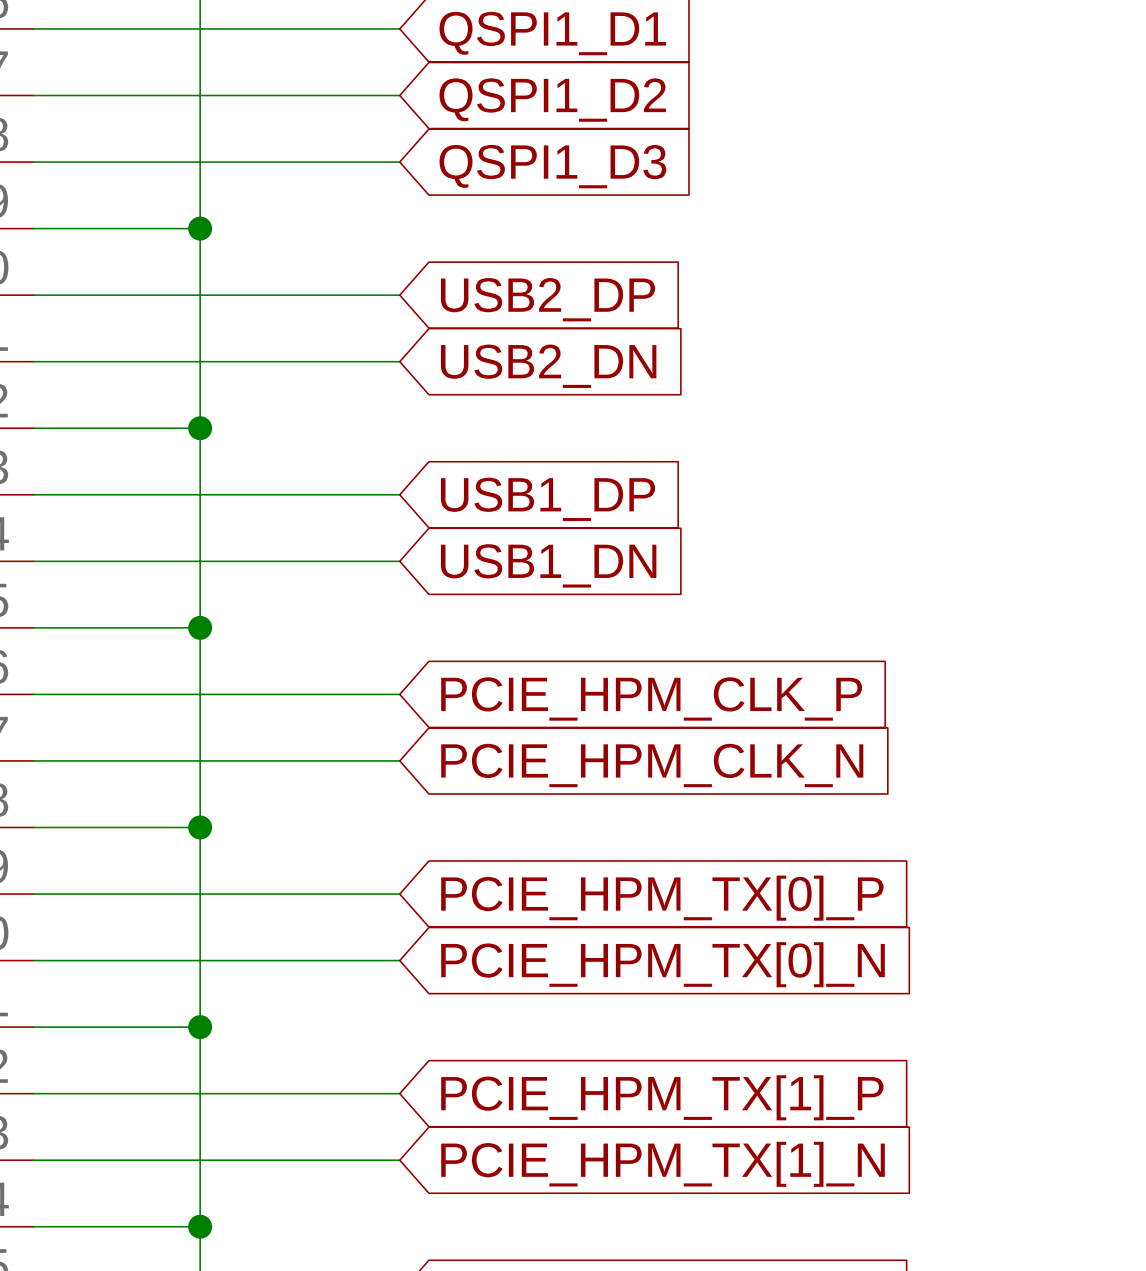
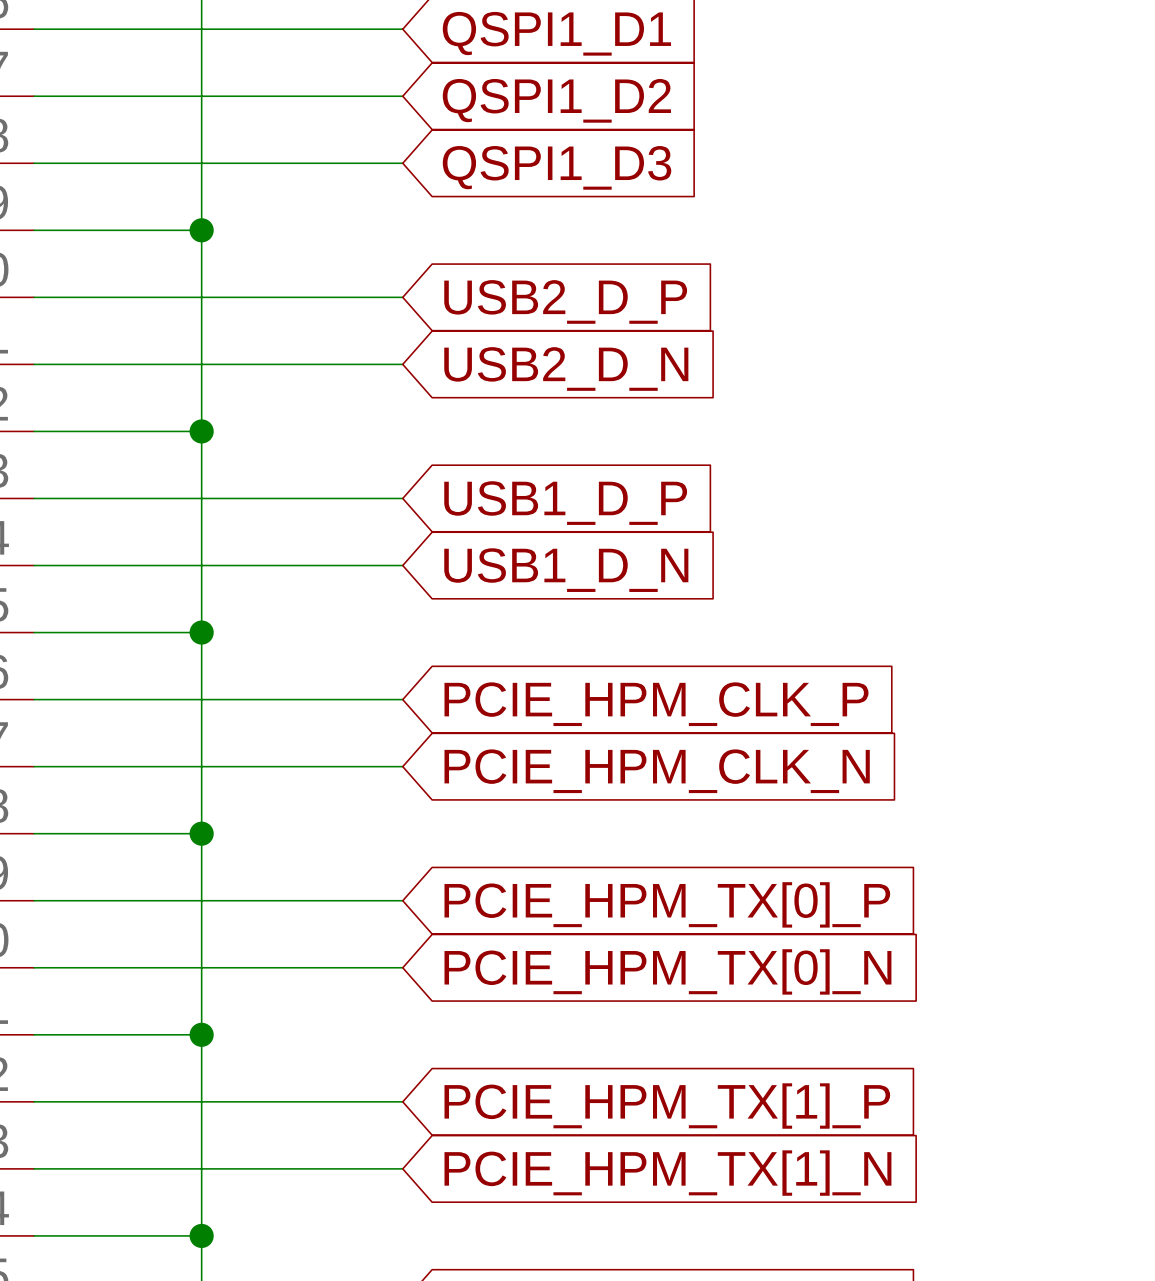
global label: USB2_DP (548, 299) -> USB2_D_P (565, 301)
global label: USB2_DN (548, 366) -> USB2_D_N (566, 368)
global label: USB1_DP (548, 499) -> USB1_D_P (565, 503)
global label: USB1_DN (548, 565) -> USB1_D_N (566, 570)

